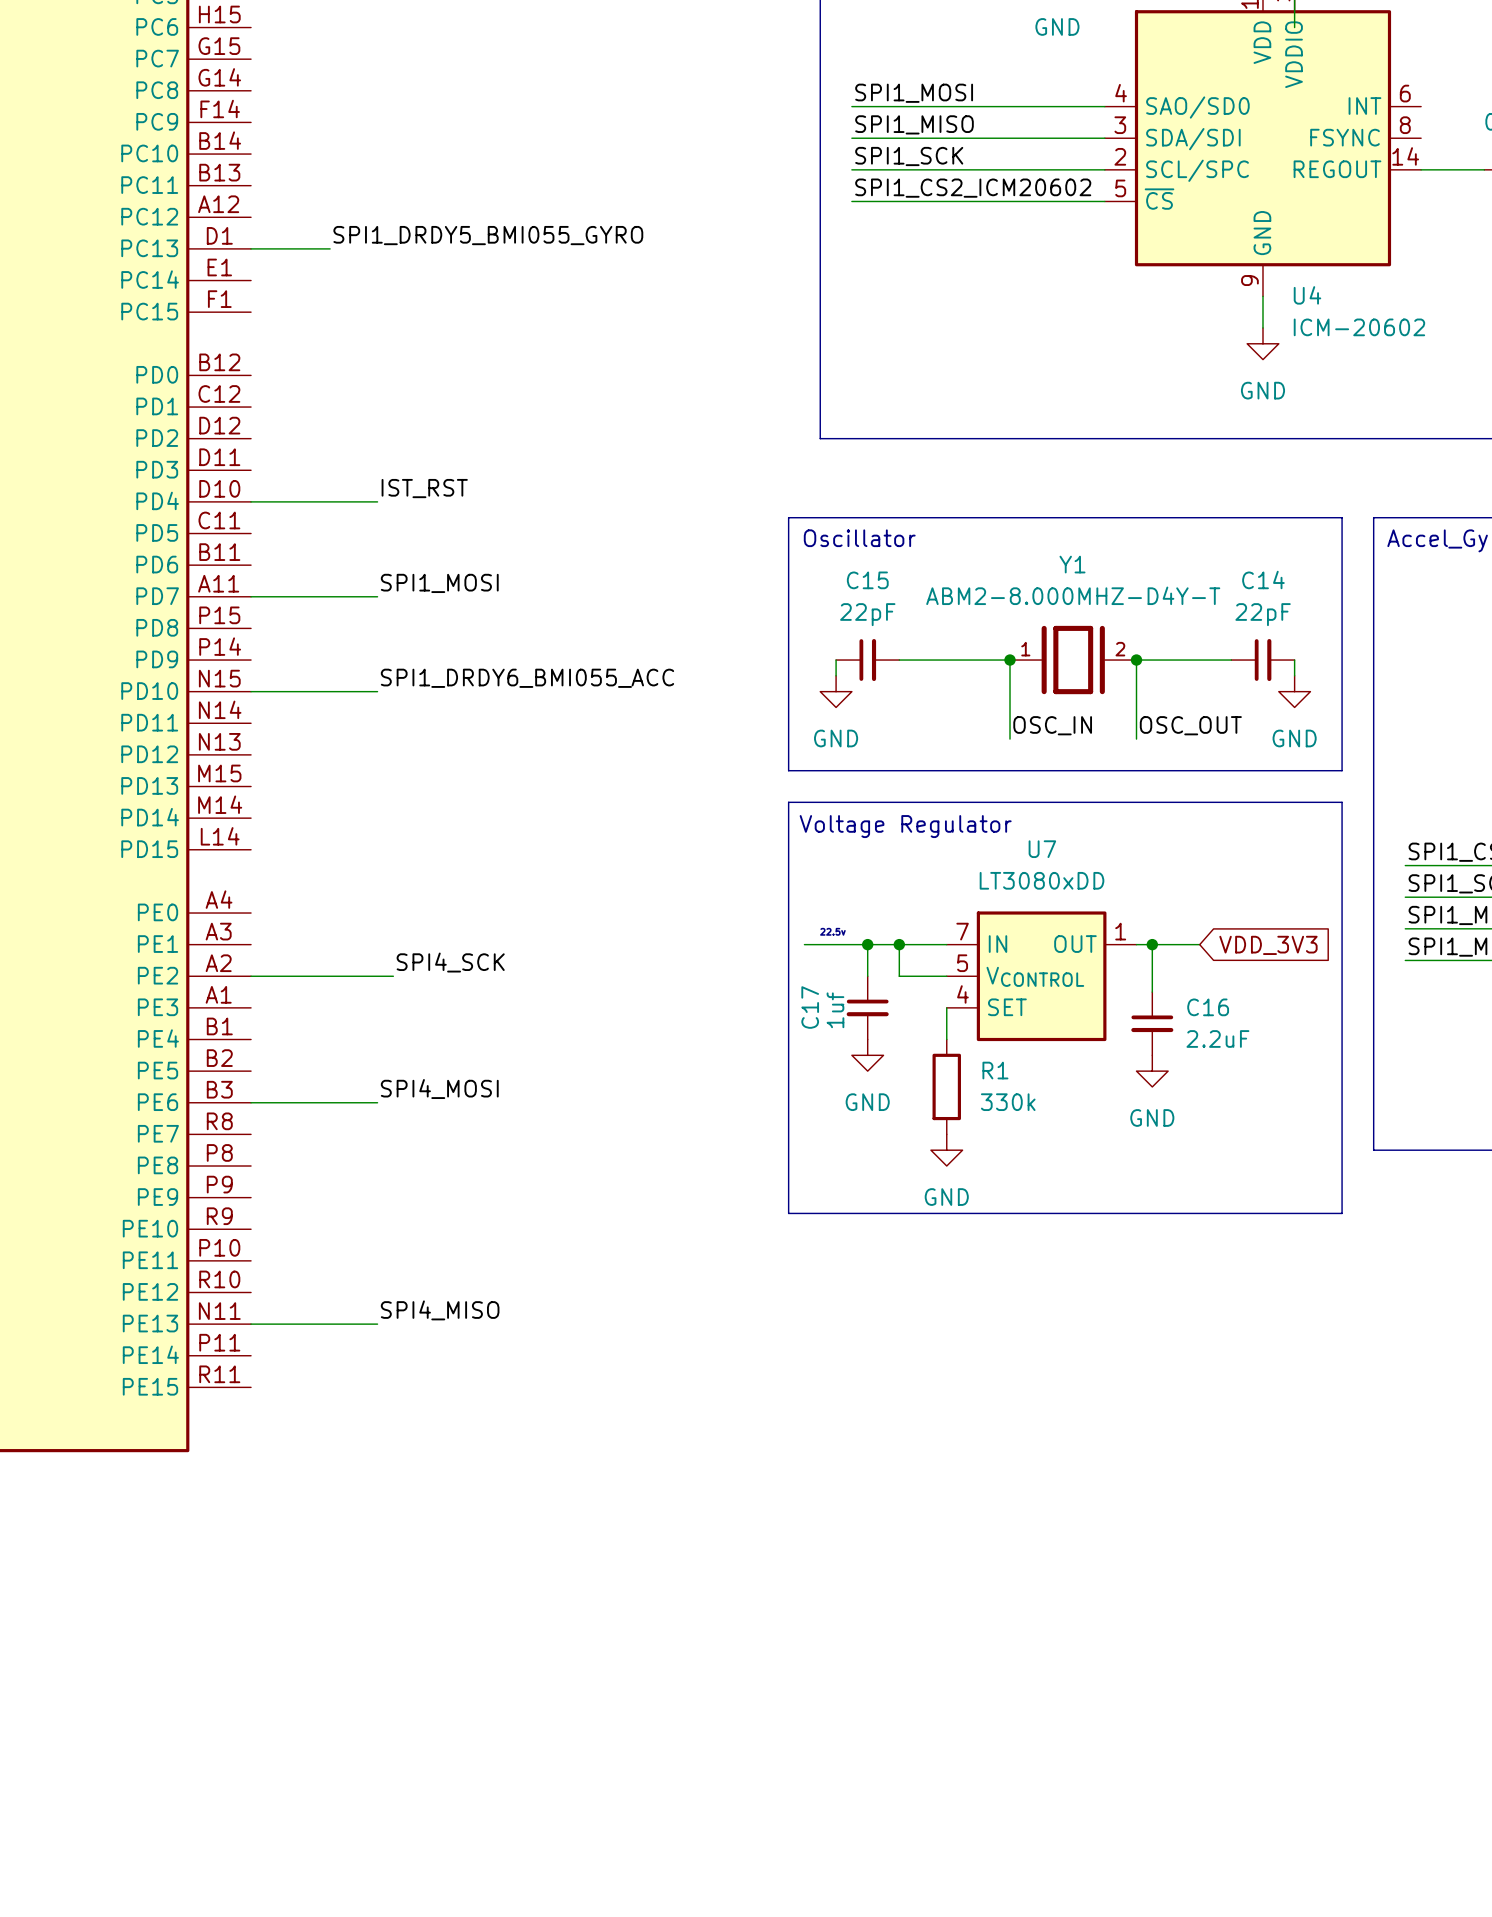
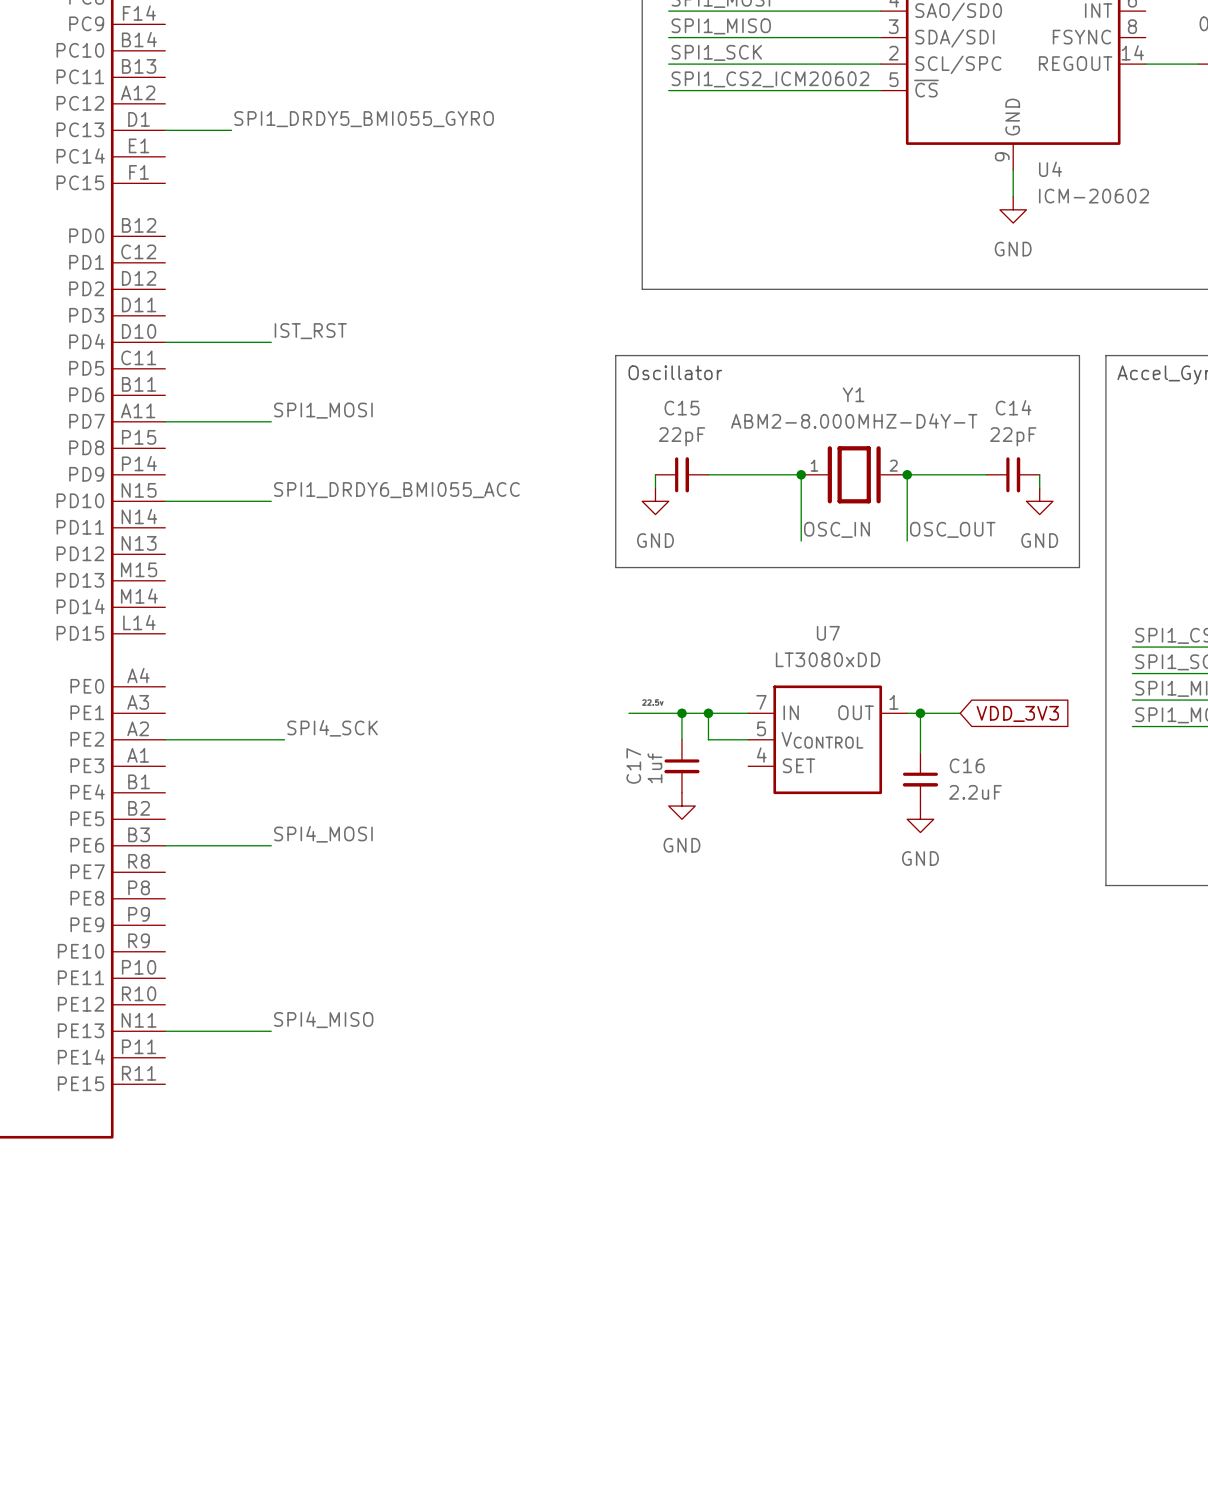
line: (788, 802) (1342, 802) (1342, 1213) (788, 1213) (788, 802) -> none
text: Voltage Regulator (905, 826) -> none
wire: (946, 1007) (946, 1039) -> none
R1: 330k (946, 1086) -> none
power symbol: GND (946, 1150) -> none

